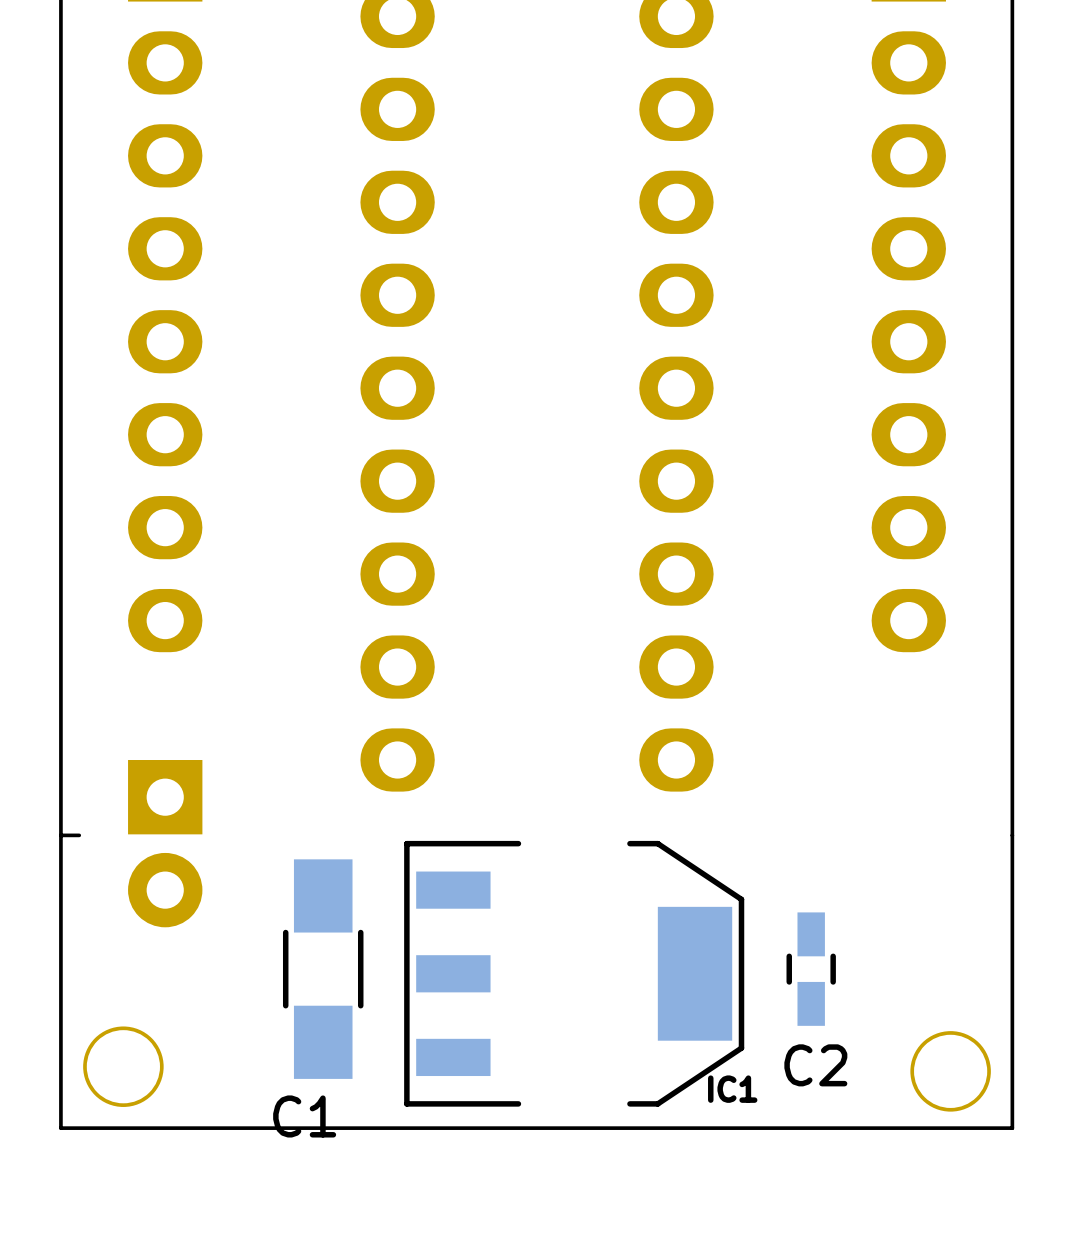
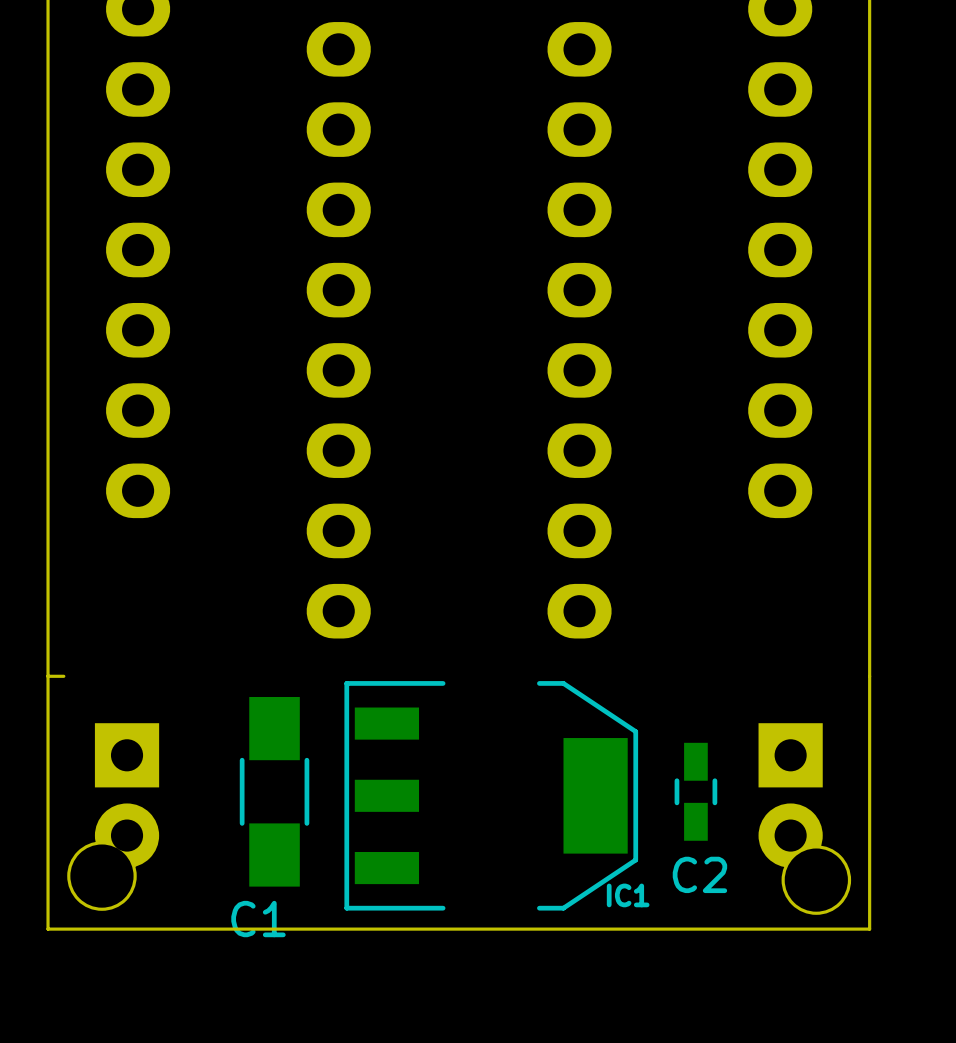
part position: (165, 843) -> (127, 795)
part: none -> (790, 795)

